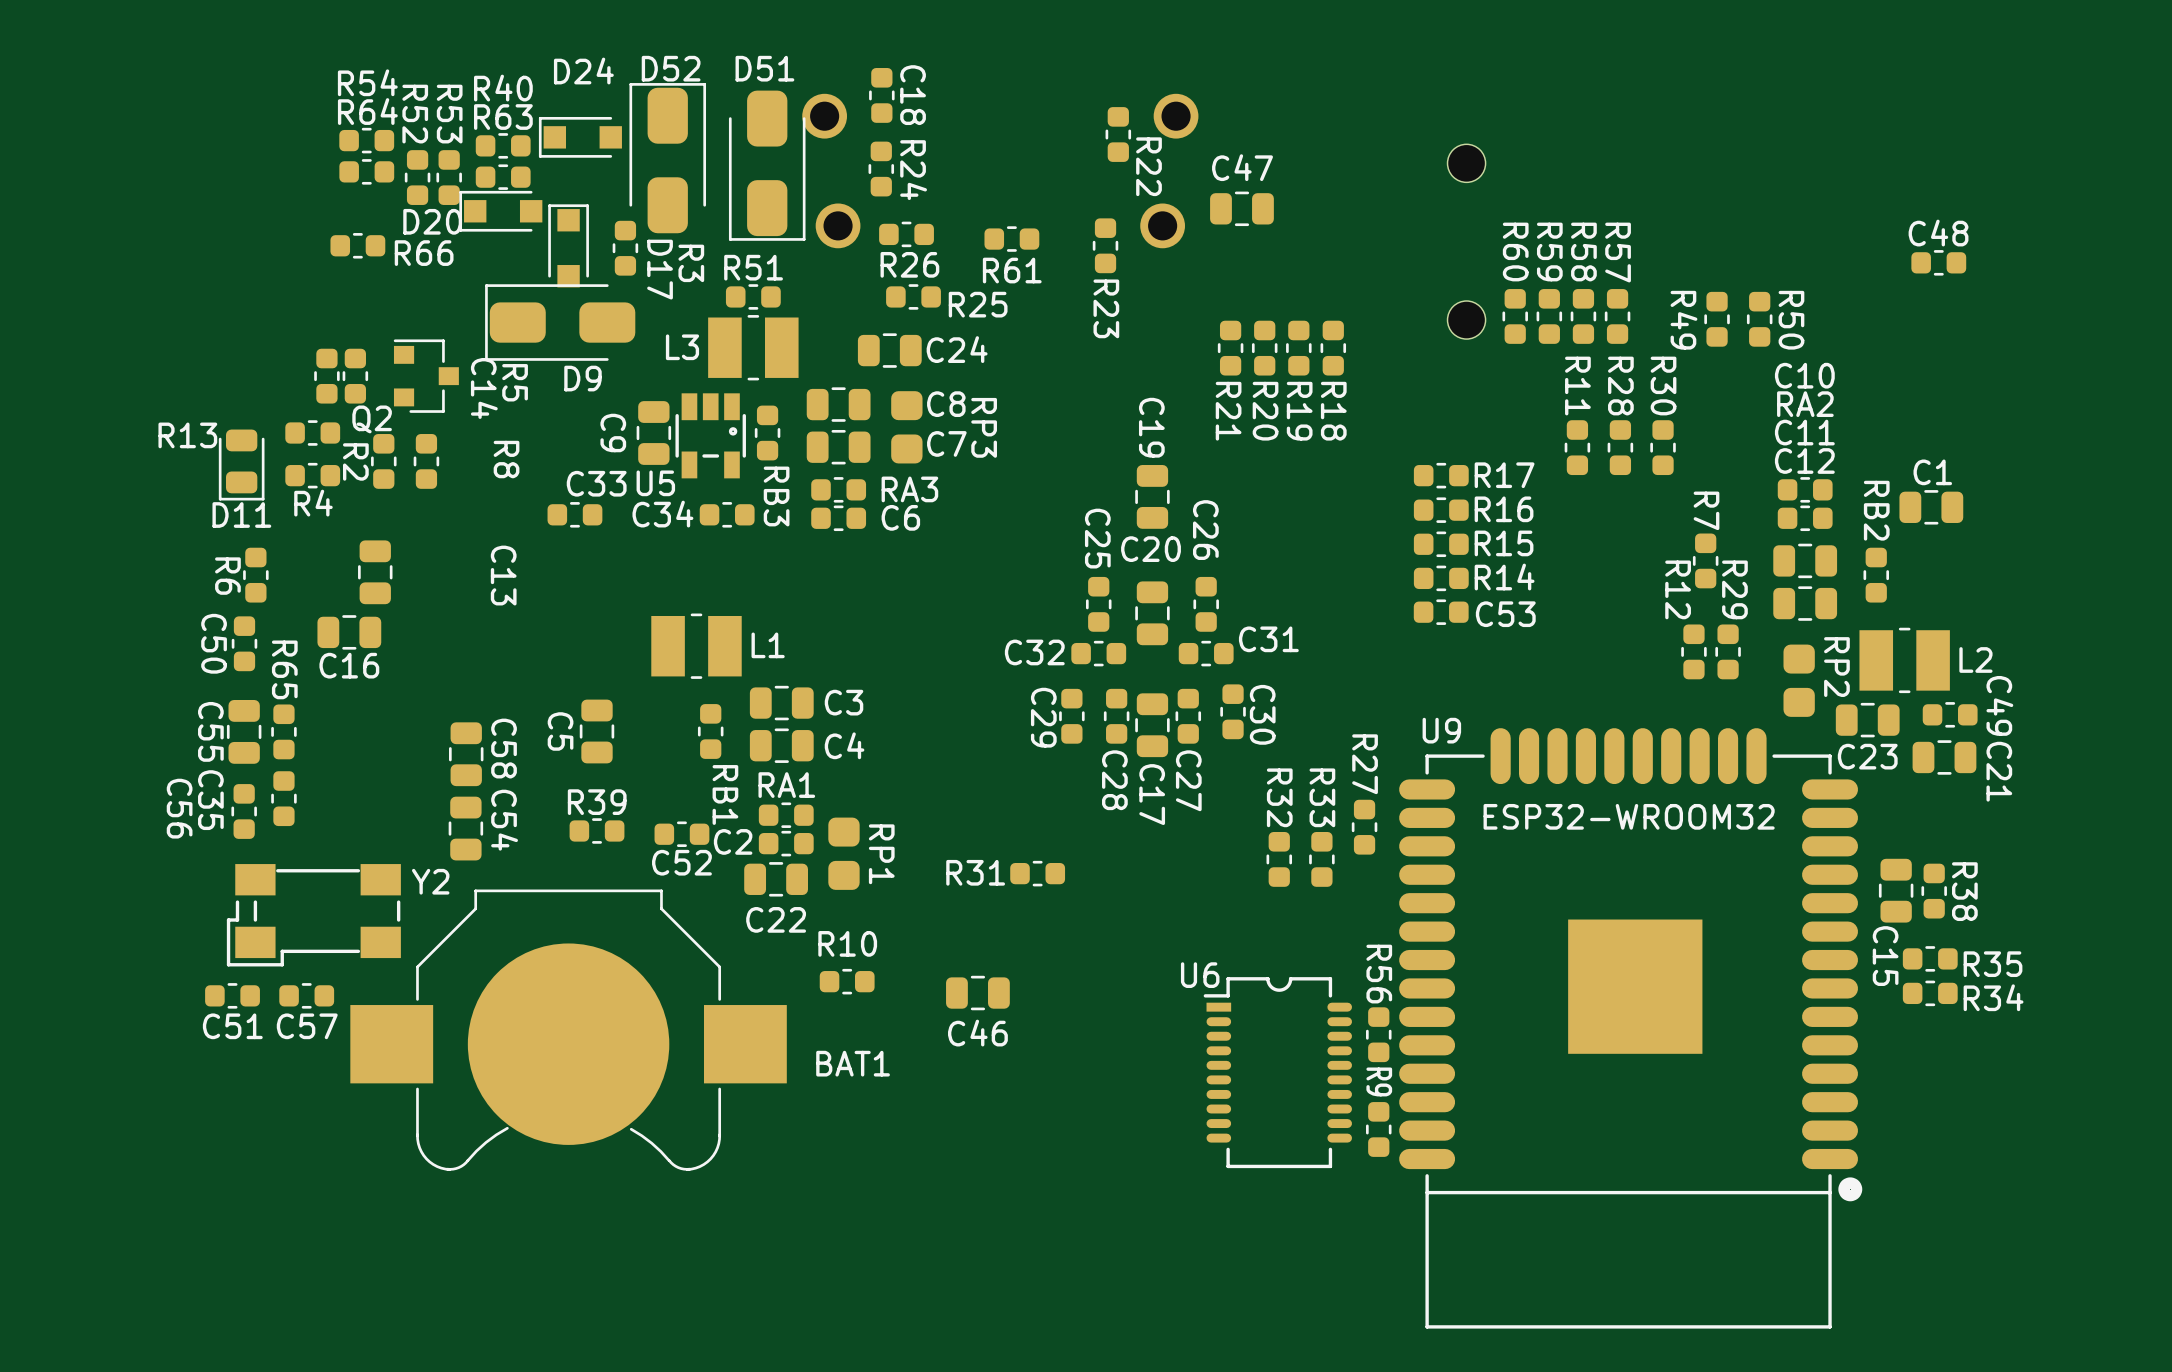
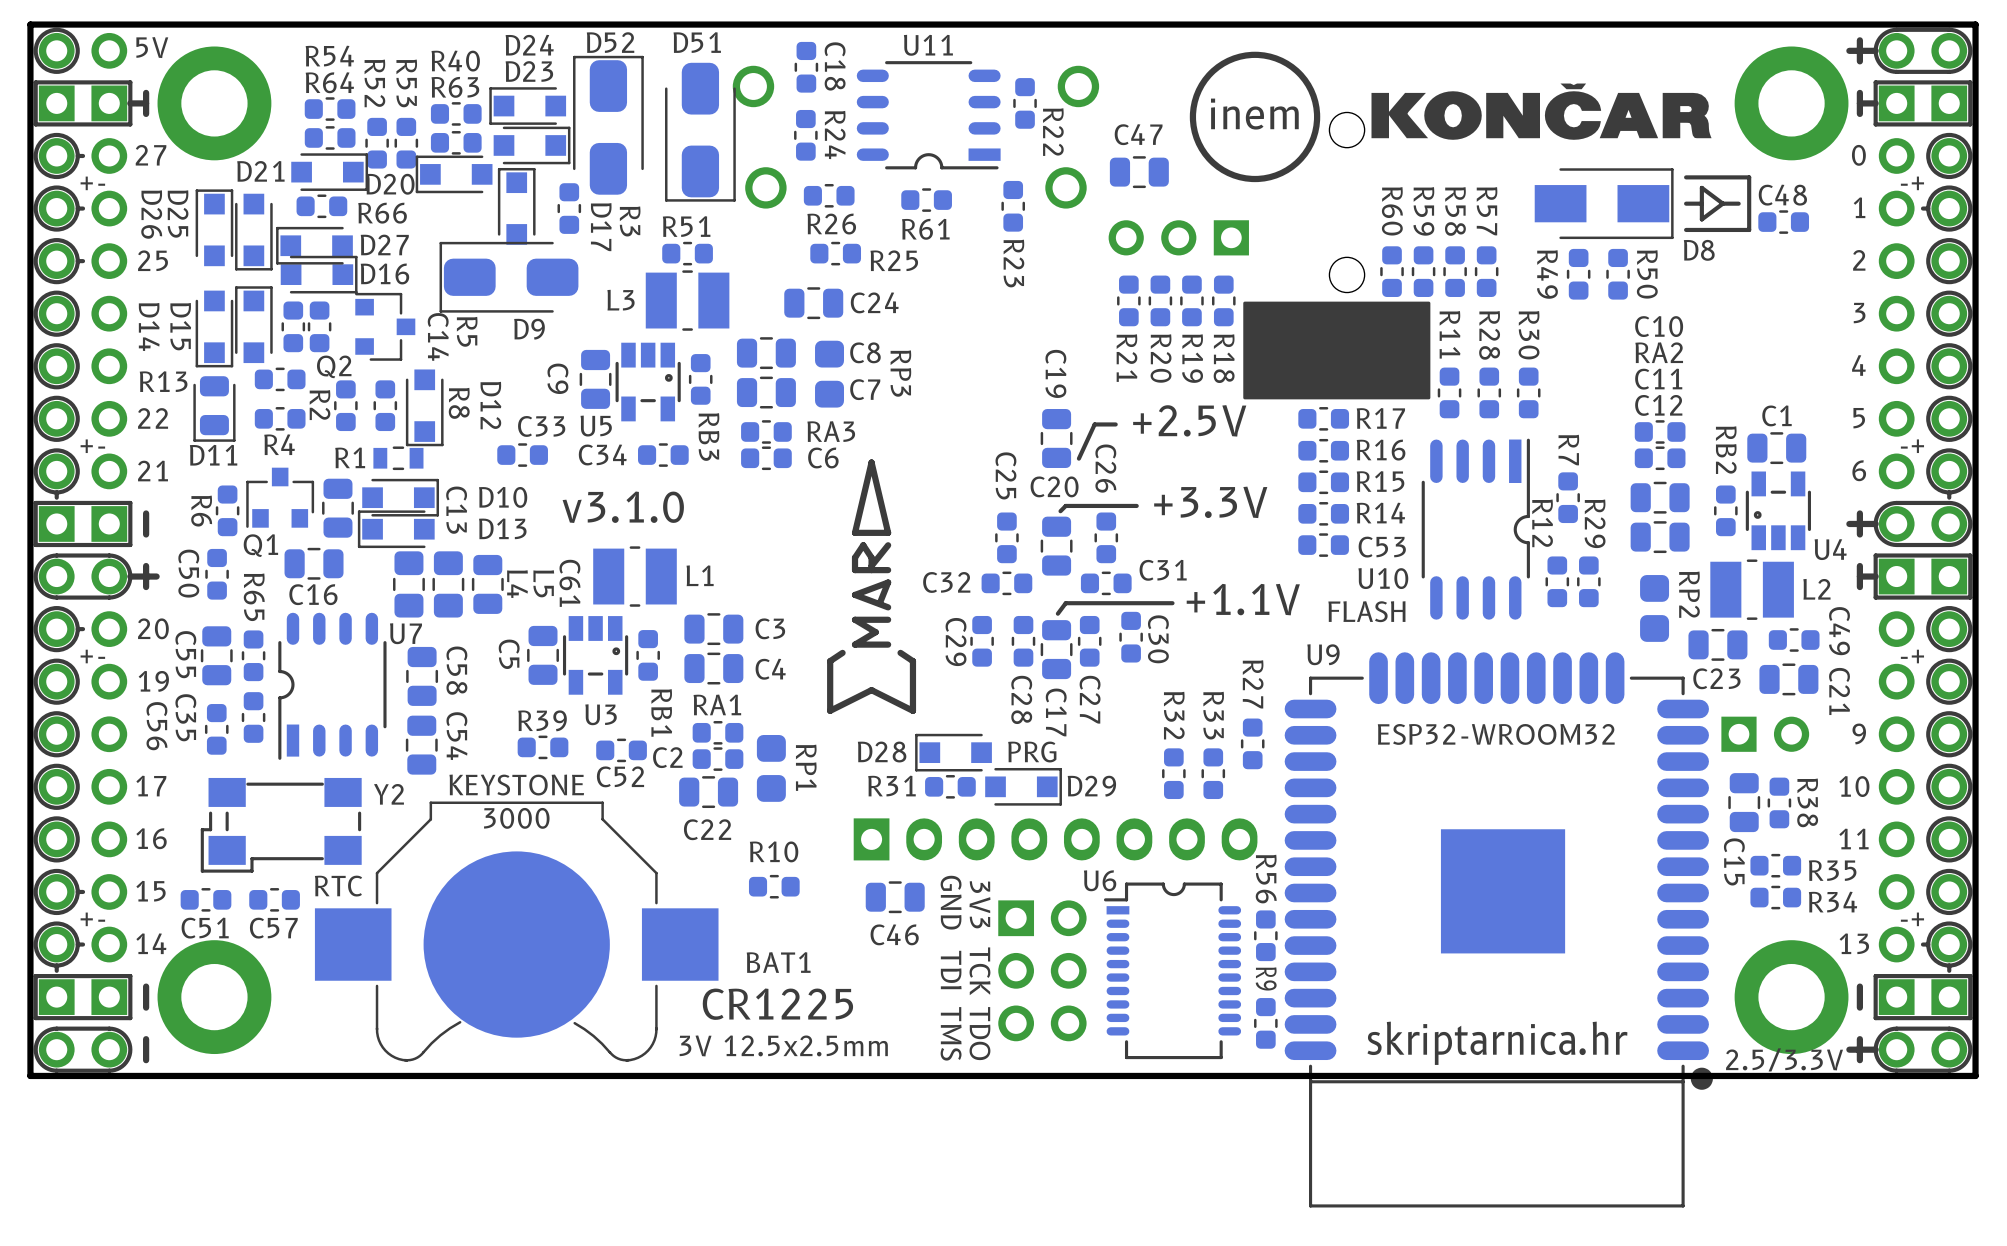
board edge: none -> (1975, 24) (1975, 1075) (30, 1075) (30, 24) (1975, 24)
drawing: none -> [33, 27, 80, 74]
line: none -> (1949, 29) (1888, 31) (1881, 35) (1877, 42) (1875, 50) (1877, 58) (1883, 67) (1893, 71) (1957, 70) (1967, 61) (1970, 48) (1964, 35) (1957, 31) (1949, 29)
line: none -> (1859, 40) (1859, 61)
text: none -> 5V (152, 47)
line: none -> (1875, 50) (1849, 50)
drawing: none -> [1189, 51, 1321, 183]
line: none -> (130, 82) (35, 82) (35, 124) (130, 124) (130, 82)
line: none -> (1970, 82) (1970, 124) (1875, 124) (1875, 82) (1970, 82)
drawing: none -> [1371, 83, 1712, 140]
line: none -> (146, 92) (146, 113)
line: none -> (1859, 92) (1859, 113)
line: none -> (146, 103) (130, 103)
part: none -> (214, 103)
part: none -> (1791, 103)
line: none -> (1875, 103) (1859, 103)
U11: none -> (928, 115)
drawing: none -> [33, 132, 80, 495]
drawing: none -> [1926, 132, 1973, 495]
D23: none -> (532, 145)
text: none -> 27 (151, 155)
text: none -> 0 (1858, 155)
line: none -> (83, 155) (77, 155)
D21: none -> (329, 172)
line: none -> (1686, 177) (1749, 177) (1749, 229) (1686, 229)
text: none -> +- (92, 183)
text: none -> -+ (1912, 183)
D8: none -> (1604, 203)
line: none -> (1701, 203) (1686, 203)
line: none -> (1722, 203) (1701, 187) (1701, 219) (1722, 203)
line: none -> (1738, 203) (1722, 203)
text: none -> 1 (1859, 207)
line: none -> (83, 208) (77, 208)
line: none -> (1928, 208) (1922, 208)
D26: none -> (214, 227)
D25: none -> (253, 232)
part: none -> (1178, 237)
D27: none -> (314, 245)
text: none -> 25 (153, 260)
text: none -> 2 (1859, 260)
line: none -> (83, 261) (77, 261)
D16: none -> (319, 274)
drawing: none -> [1243, 301, 1431, 400]
text: none -> 3 (1859, 313)
D15: none -> (253, 324)
D14: none -> (214, 329)
text: none -> 4 (1858, 365)
D12: none -> (424, 407)
text: none -> 5 (1859, 418)
text: none -> 22 (153, 418)
text: none -> +2.5V (1189, 420)
line: none -> (1115, 424) (1094, 424) (1078, 458)
text: none -> +- (92, 446)
text: none -> -+ (1912, 446)
R1: none -> (398, 458)
drawing: none -> [827, 459, 917, 714]
text: none -> 6 (1859, 470)
text: none -> 21 (153, 471)
line: none -> (56, 492) (56, 497)
line: none -> (1949, 492) (1949, 497)
D10: none -> (400, 497)
Q1: none -> (280, 497)
text: none -> +3.3V (1210, 502)
line: none -> (130, 502) (35, 502) (35, 545) (130, 545) (130, 502)
line: none -> (1949, 502) (1888, 504) (1881, 509) (1877, 515) (1875, 523) (1877, 532) (1883, 540) (1893, 544) (1957, 543) (1967, 534) (1970, 521) (1964, 509) (1957, 504) (1949, 502)
line: none -> (1136, 505) (1065, 505) (1060, 511)
text: none -> v3.1.0 (623, 507)
U4: none -> (1778, 510)
line: none -> (146, 513) (146, 534)
line: none -> (1859, 513) (1859, 534)
line: none -> (1875, 523) (1849, 523)
U10: none -> (1475, 529)
D13: none -> (396, 529)
part: none -> (83, 550)
part: none -> (1922, 550)
line: none -> (109, 555) (48, 557) (41, 561) (37, 568) (35, 576) (37, 584) (43, 593) (53, 597) (117, 595) (127, 587) (130, 579) (129, 571) (122, 559) (109, 555)
line: none -> (1970, 555) (1875, 555) (1875, 597) (1970, 597) (1970, 555)
line: none -> (146, 566) (146, 587)
line: none -> (1859, 566) (1859, 587)
line: none -> (156, 576) (130, 576)
line: none -> (1875, 576) (1859, 576)
L4: none -> (408, 584)
L5: none -> (448, 584)
C61: none -> (487, 584)
text: none -> +1.1V (1243, 599)
line: none -> (1172, 603) (1065, 603) (1057, 613)
drawing: none -> [33, 606, 80, 968]
drawing: none -> [1926, 606, 1973, 968]
text: none -> FLASH (1366, 611)
text: none -> 20 (153, 628)
line: none -> (83, 629) (77, 629)
U3: none -> (595, 655)
text: none -> +- (92, 656)
text: none -> -+ (1912, 656)
text: none -> 19 (153, 681)
U7: none -> (332, 686)
part: none -> (1765, 734)
text: none -> 9 (1859, 733)
text: none -> PRG (1032, 752)
D28: none -> (953, 752)
text: none -> KEYSTONE (516, 785)
text: none -> 17 (151, 786)
D29: none -> (1023, 786)
text: none -> 10 (1854, 786)
text: none -> 3000 (516, 818)
text: none -> 16 (151, 838)
part: none -> (1055, 839)
text: none -> 11 (1853, 838)
text: none -> RTC (338, 886)
text: none -> 15 (150, 891)
line: none -> (83, 891) (77, 891)
text: none -> GND (951, 902)
text: none -> 3V3 (979, 904)
text: none -> +- (92, 919)
text: none -> -+ (1912, 919)
text: none -> 14 (151, 943)
text: none -> 13 (1854, 943)
line: none -> (83, 944) (77, 944)
line: none -> (1928, 944) (1922, 944)
line: none -> (56, 965) (56, 970)
line: none -> (1949, 965) (1949, 970)
text: none -> TDI (951, 970)
text: none -> TCK (980, 971)
part: none -> (1042, 970)
line: none -> (130, 976) (35, 976) (35, 1018) (130, 1018) (130, 976)
line: none -> (1970, 976) (1875, 976) (1875, 1018) (1970, 1018) (1970, 976)
line: none -> (146, 986) (146, 1007)
line: none -> (1859, 986) (1859, 1007)
part: none -> (214, 997)
part: none -> (1791, 997)
text: none -> CR1225 (777, 1004)
line: none -> (109, 1028) (48, 1030) (41, 1034) (37, 1041) (35, 1049) (37, 1057) (43, 1066) (53, 1070) (117, 1069) (127, 1060) (130, 1052) (129, 1044) (122, 1032) (109, 1028)
line: none -> (1949, 1028) (1888, 1030) (1881, 1034) (1877, 1041) (1875, 1049) (1877, 1057) (1883, 1066) (1893, 1070) (1957, 1069) (1967, 1060) (1970, 1046) (1967, 1039) (1962, 1032) (1949, 1028)
text: none -> TMS (951, 1033)
text: none -> TDO (979, 1033)
line: none -> (146, 1039) (146, 1060)
line: none -> (1859, 1039) (1859, 1060)
text: none -> skriptarnica.hr (1497, 1043)
text: none -> 3V 12.5x2.5mm (783, 1045)
line: none -> (1875, 1049) (1849, 1049)
text: none -> 2.5/3.3V (1784, 1059)

